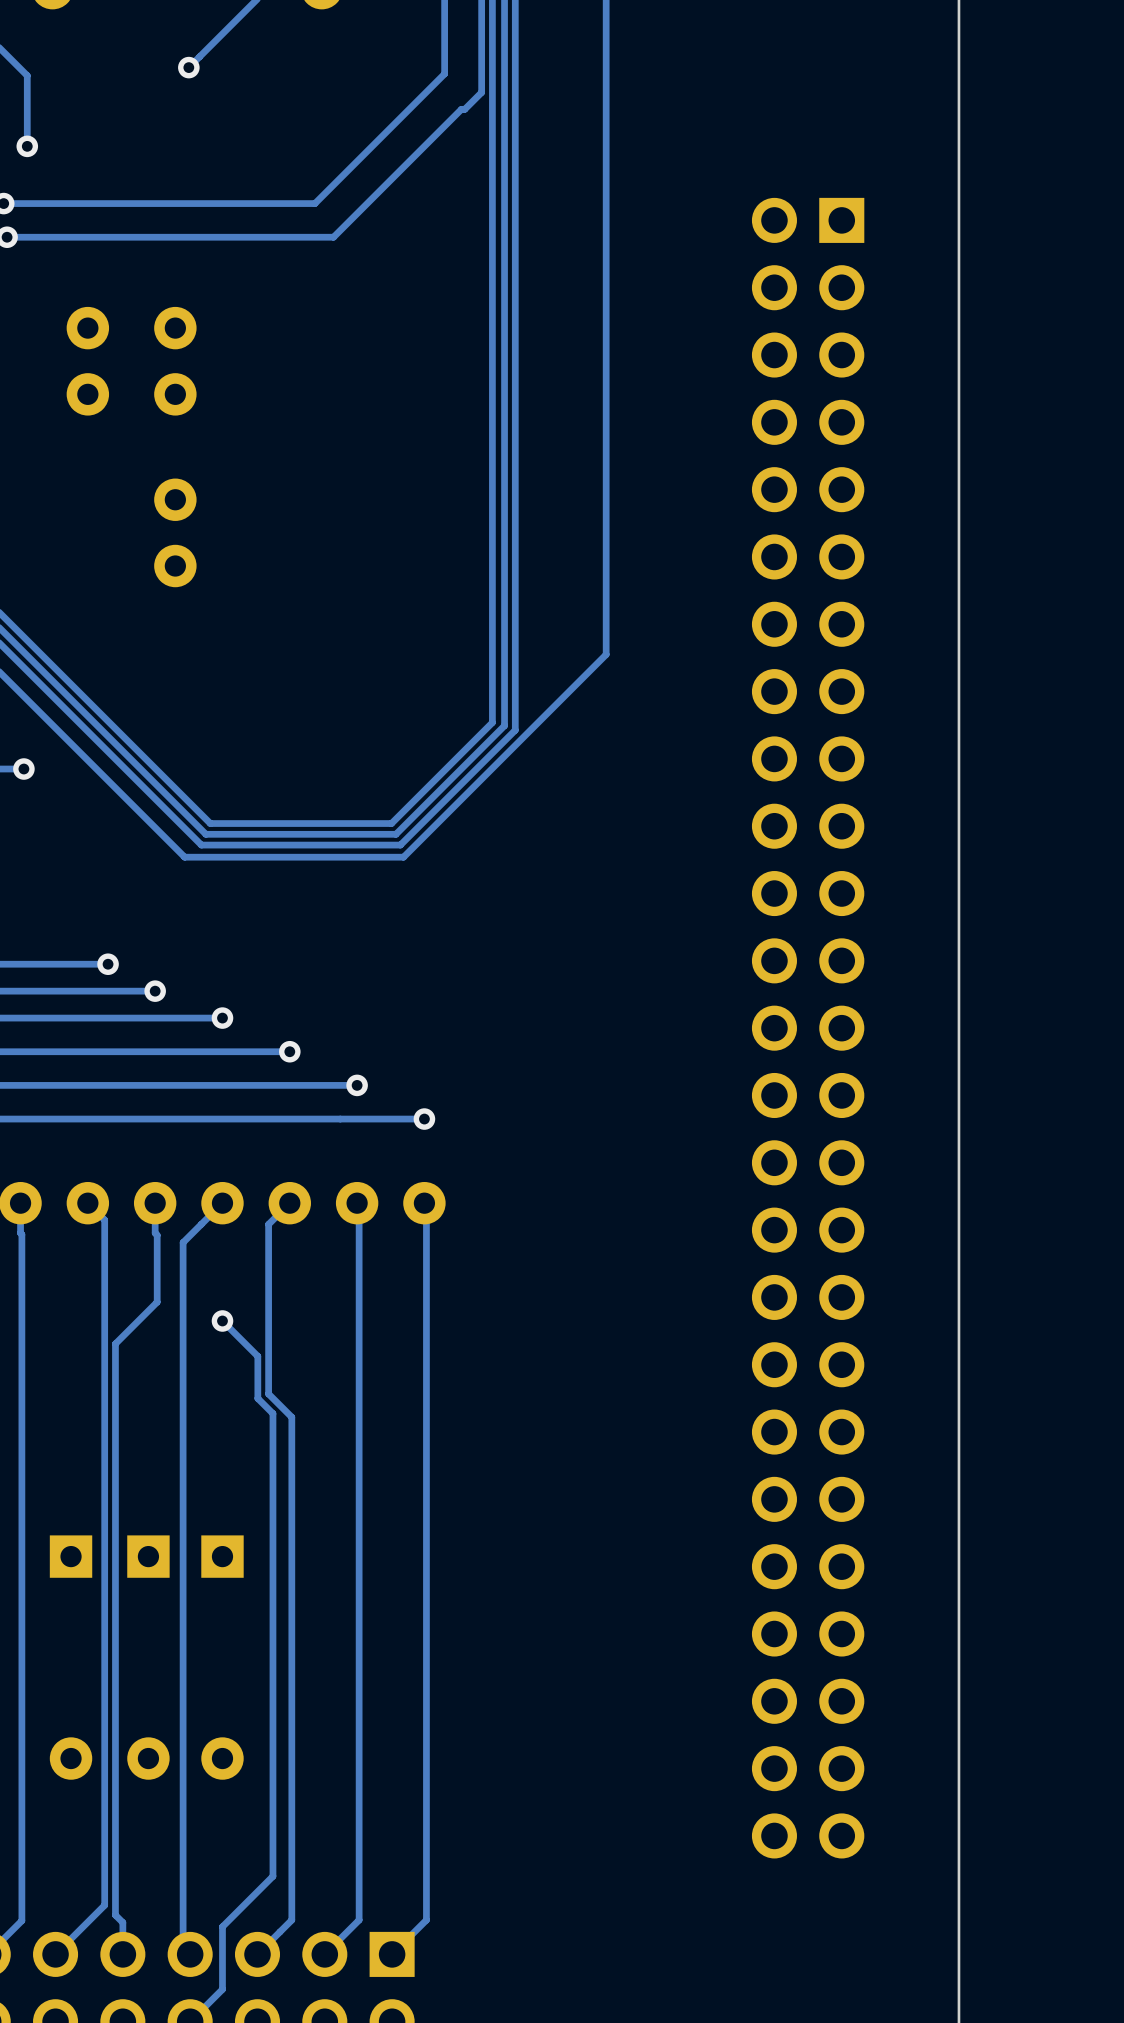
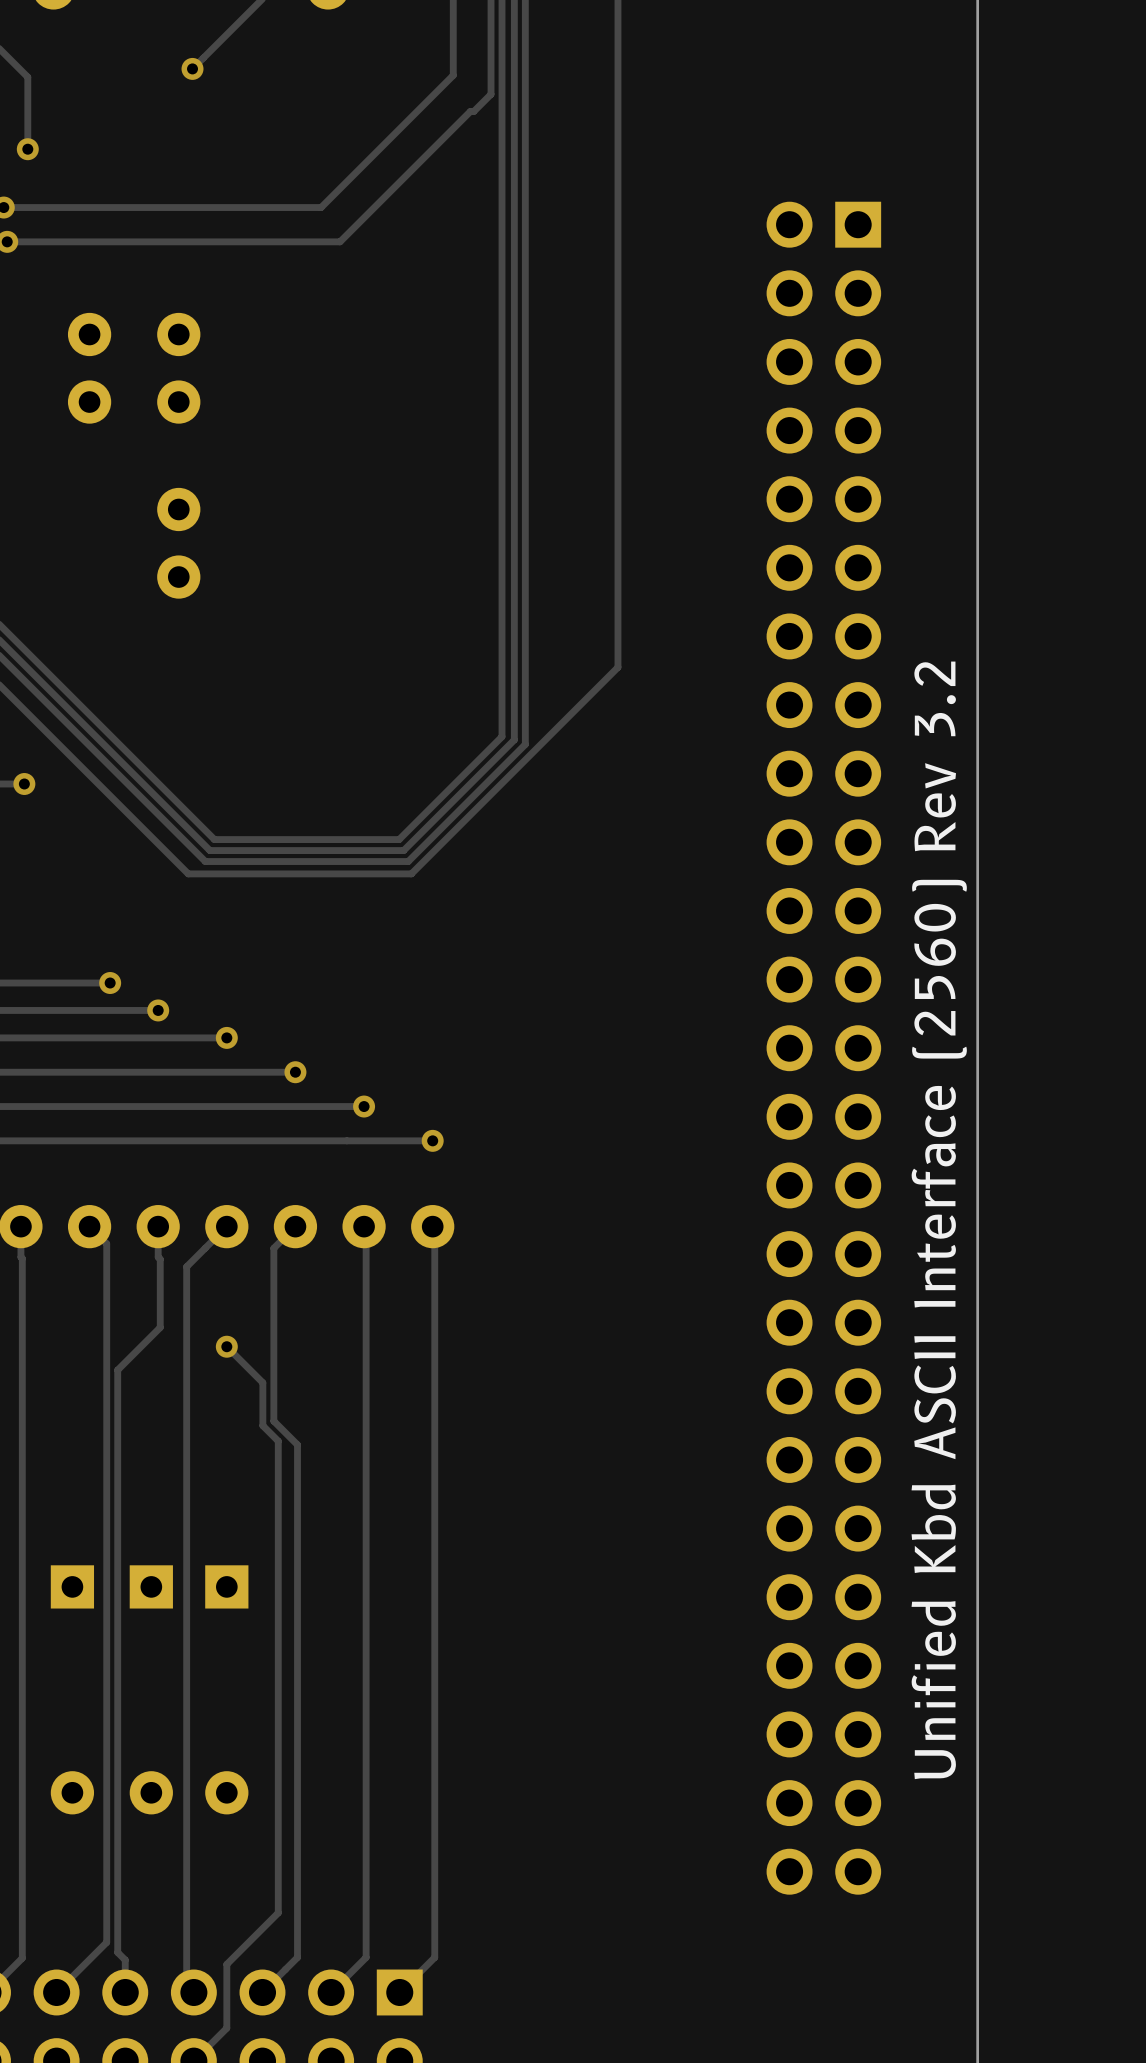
text: none -> Unified Kbd ASCII Interface (2560) Rev 3.2 (939, 1220)

